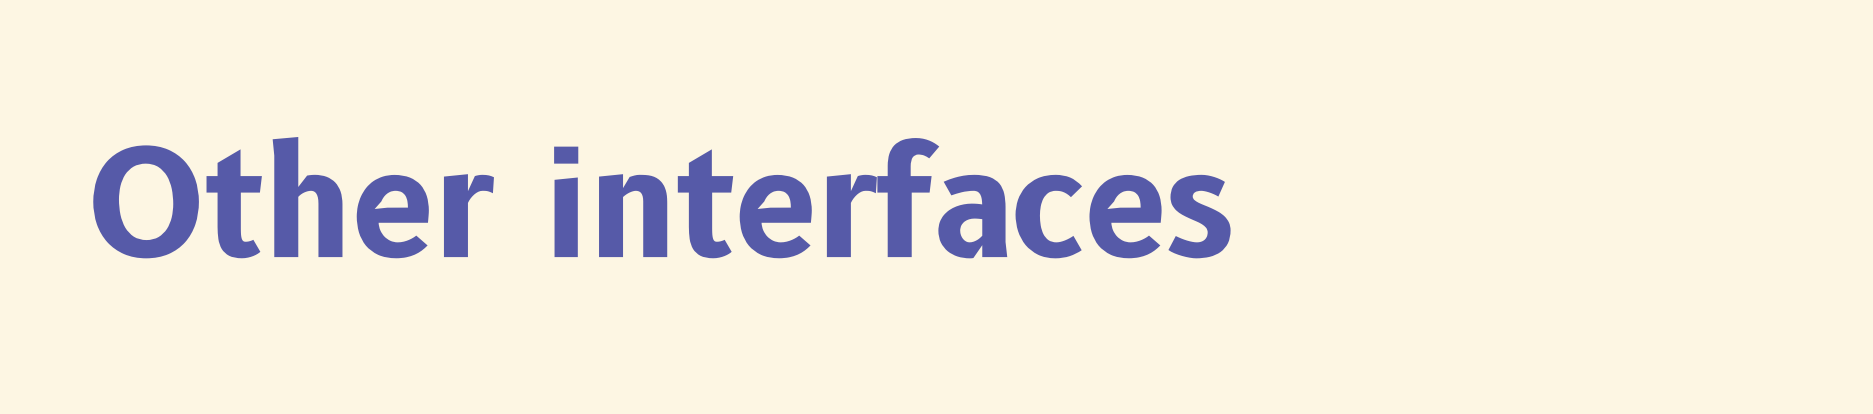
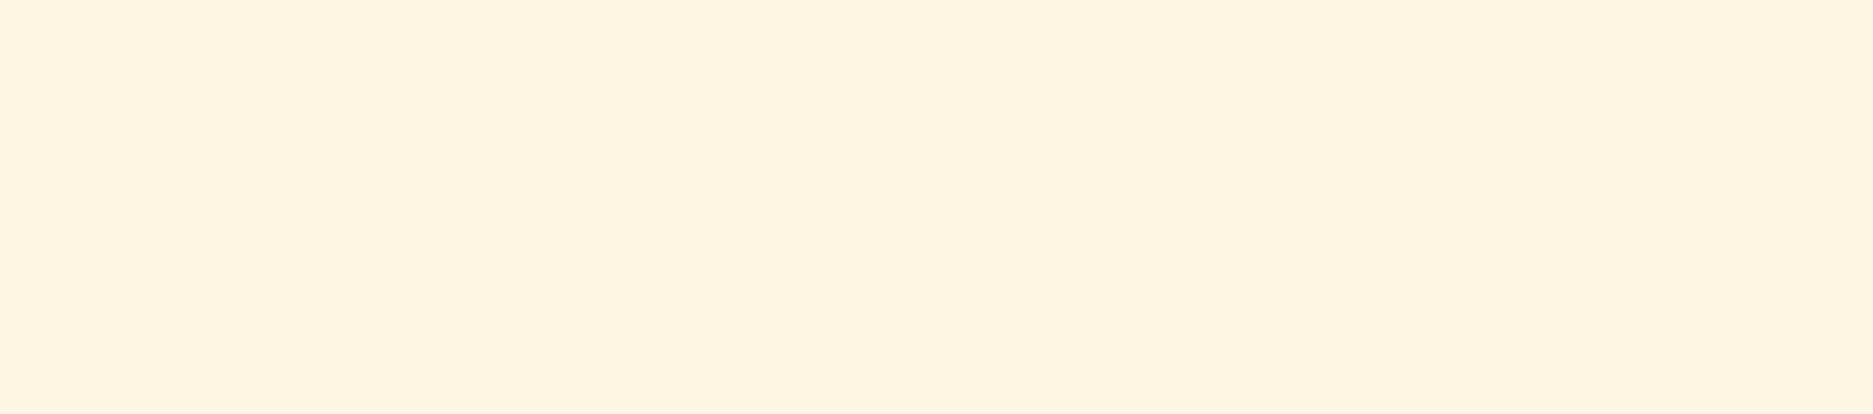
text: Other interfaces (661, 197) -> none

